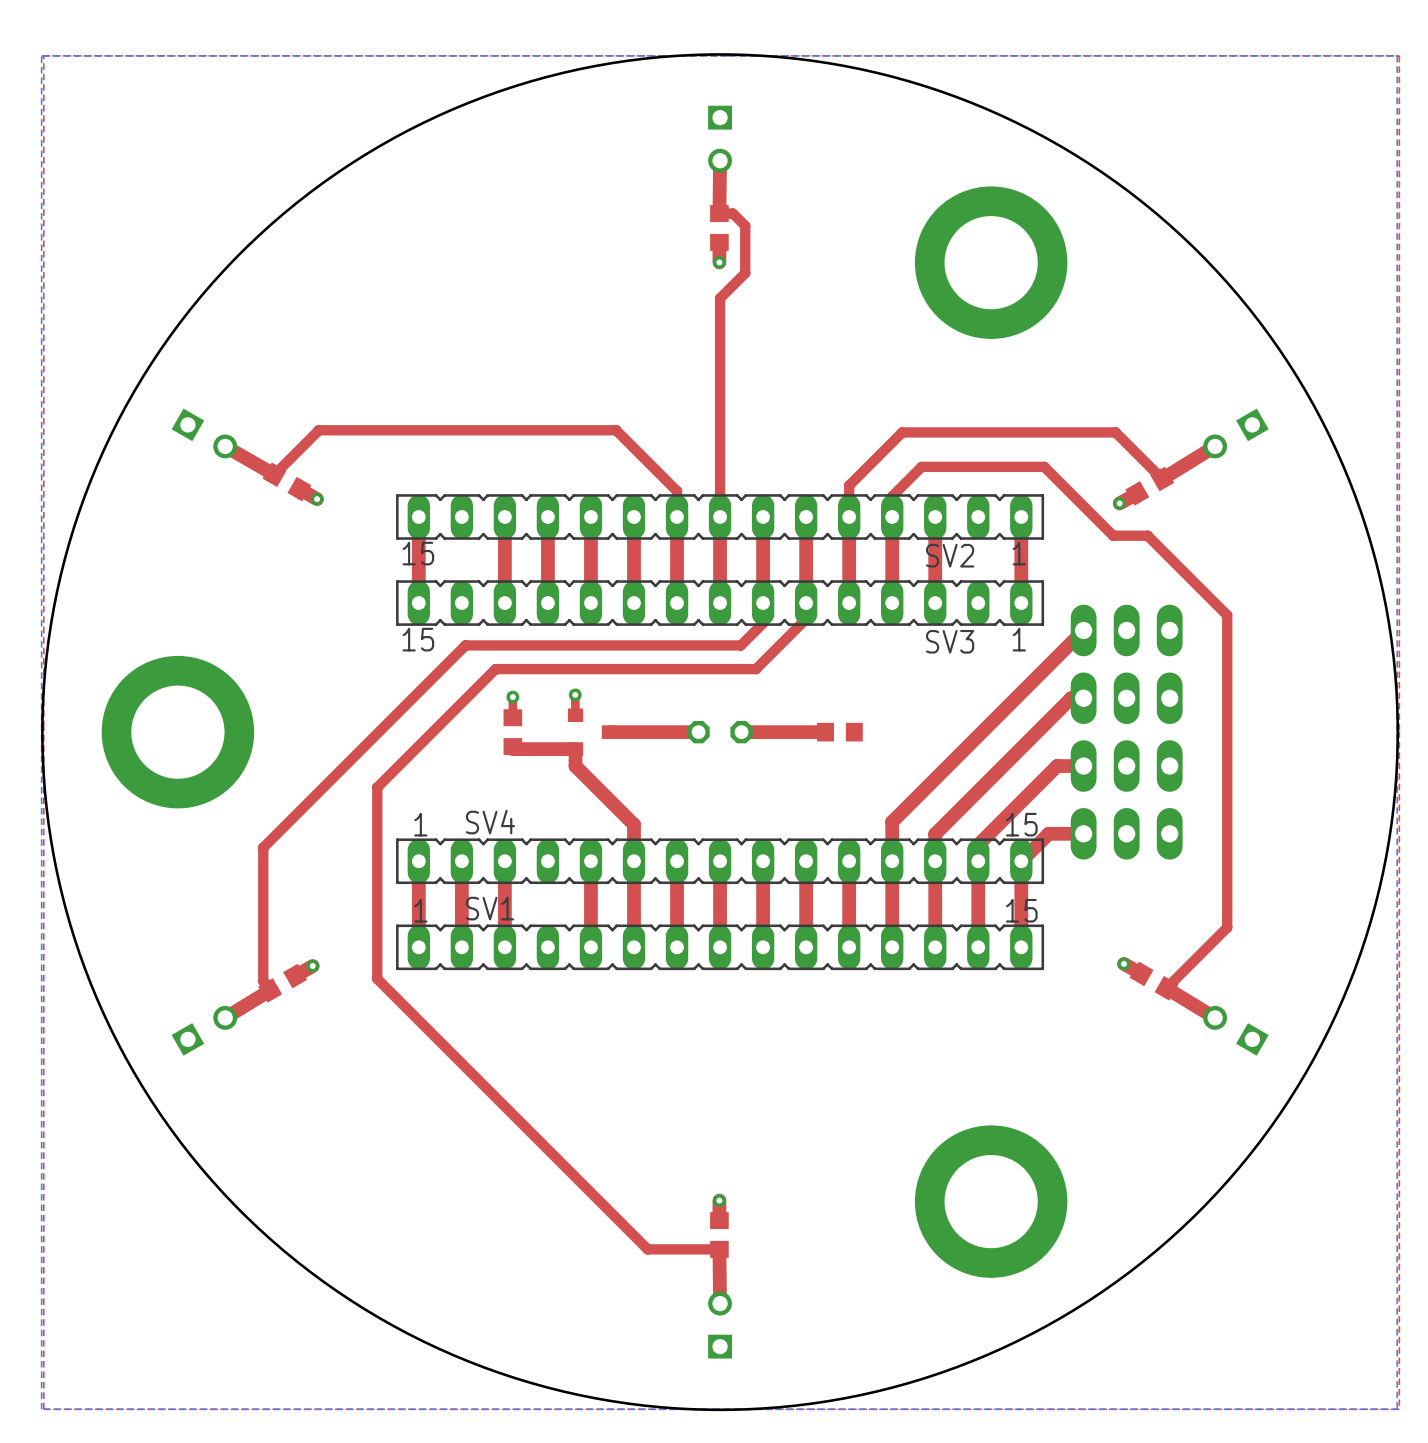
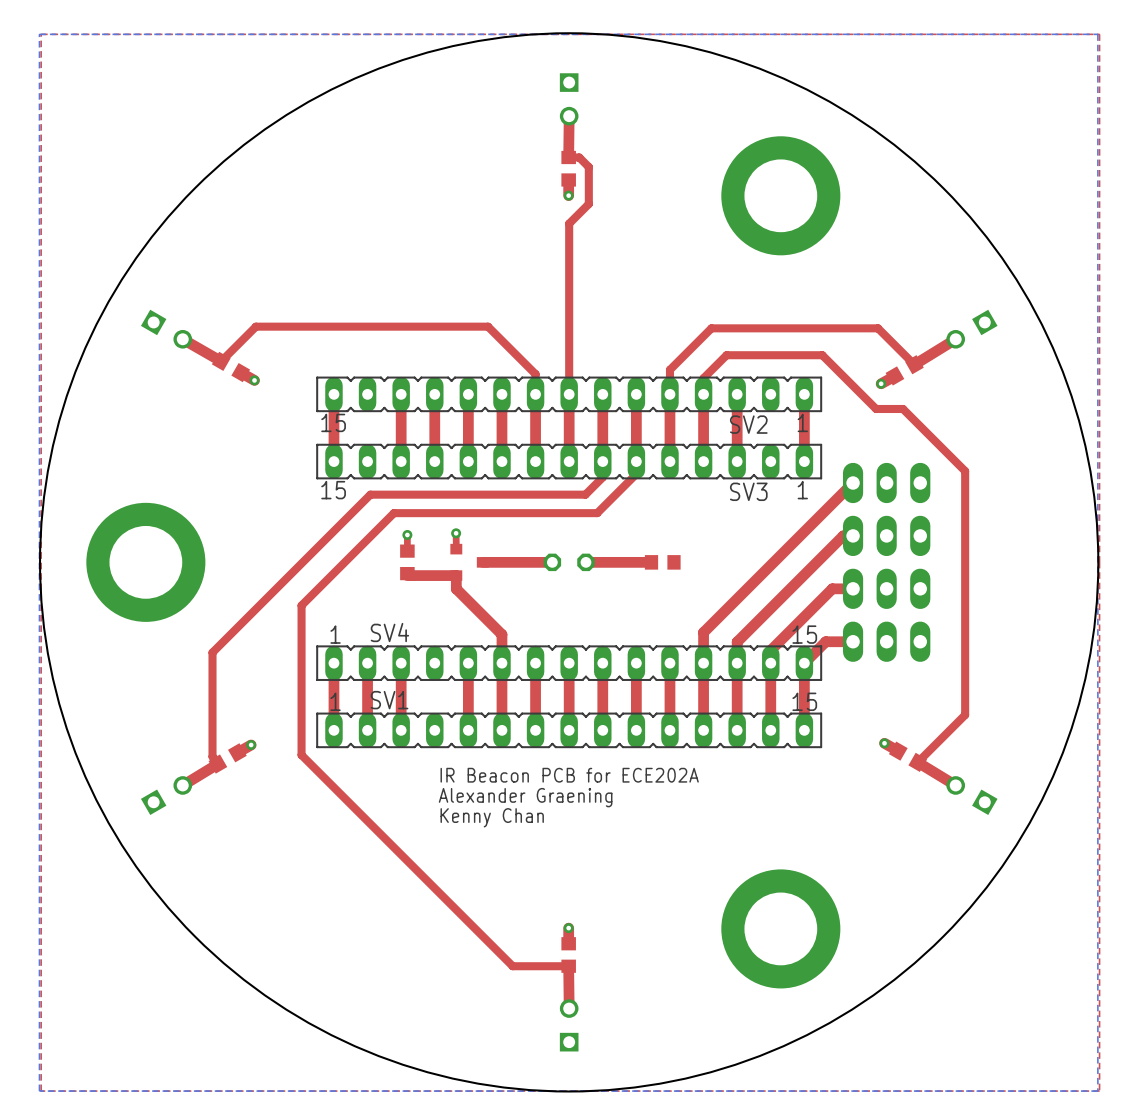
text: none -> IR Beacon PCB for ECE202A (569, 775)
text: none -> Alexander Graening (525, 797)
text: none -> Kenny Chan (492, 817)

